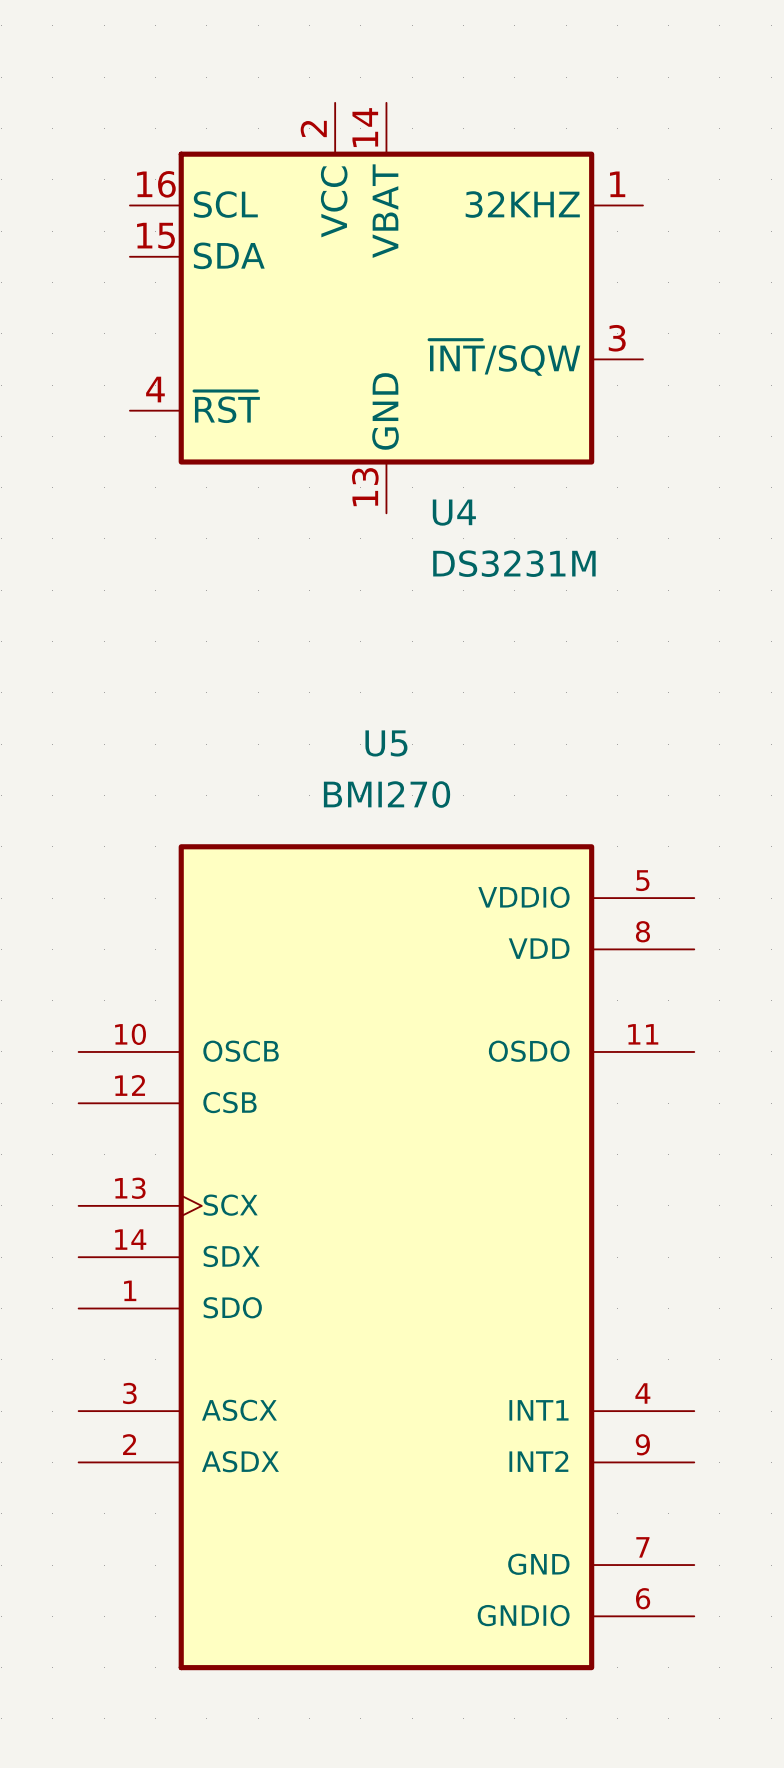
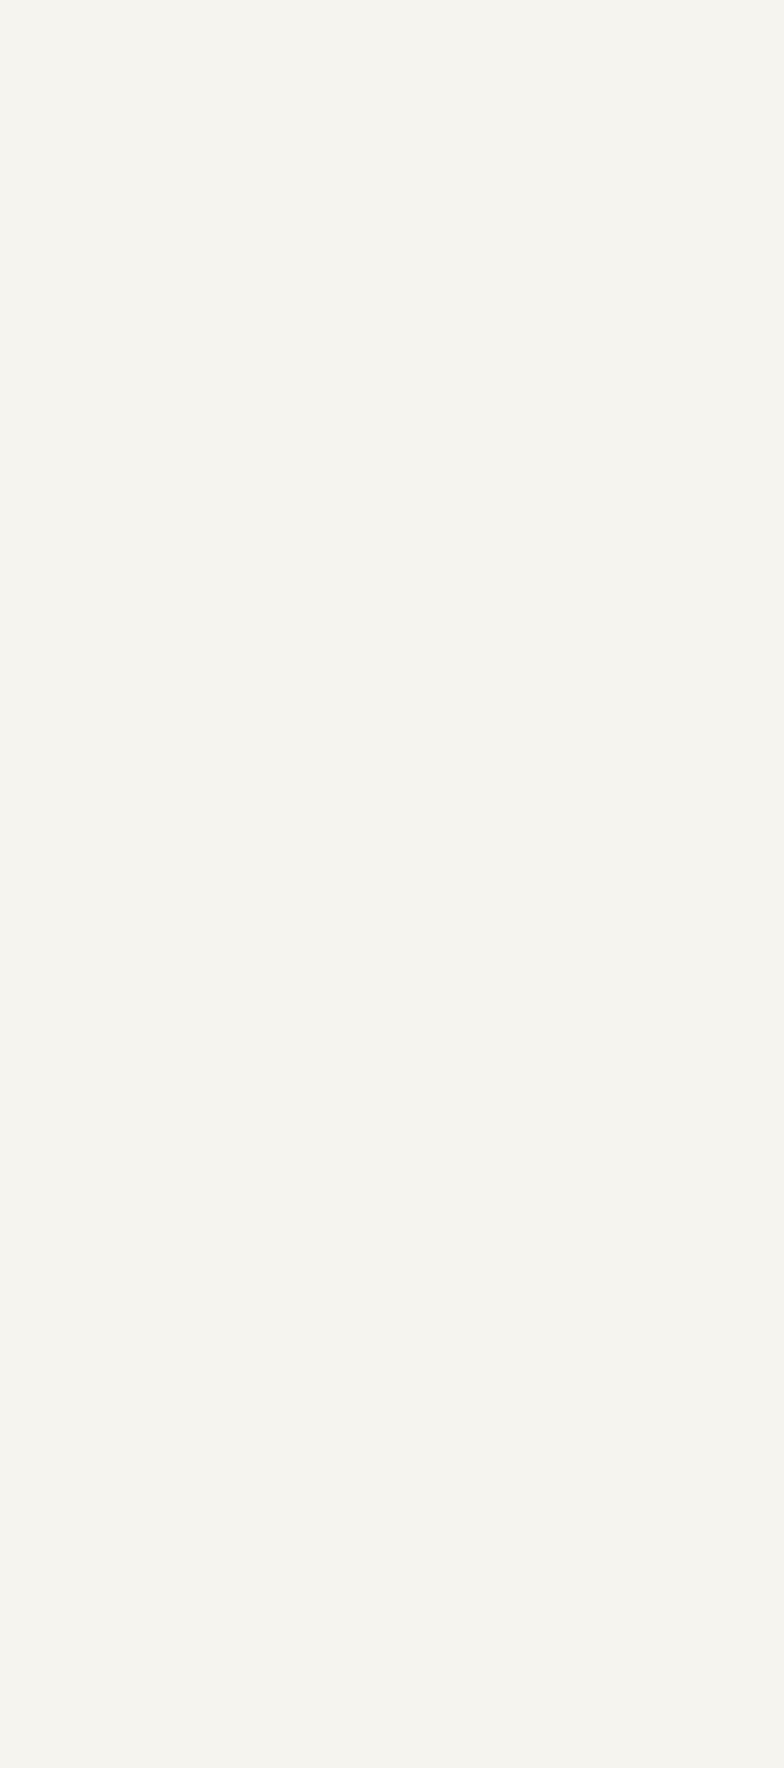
U4: DS3231M (386, 308) -> none
U5: BMI270 (386, 1257) -> none

